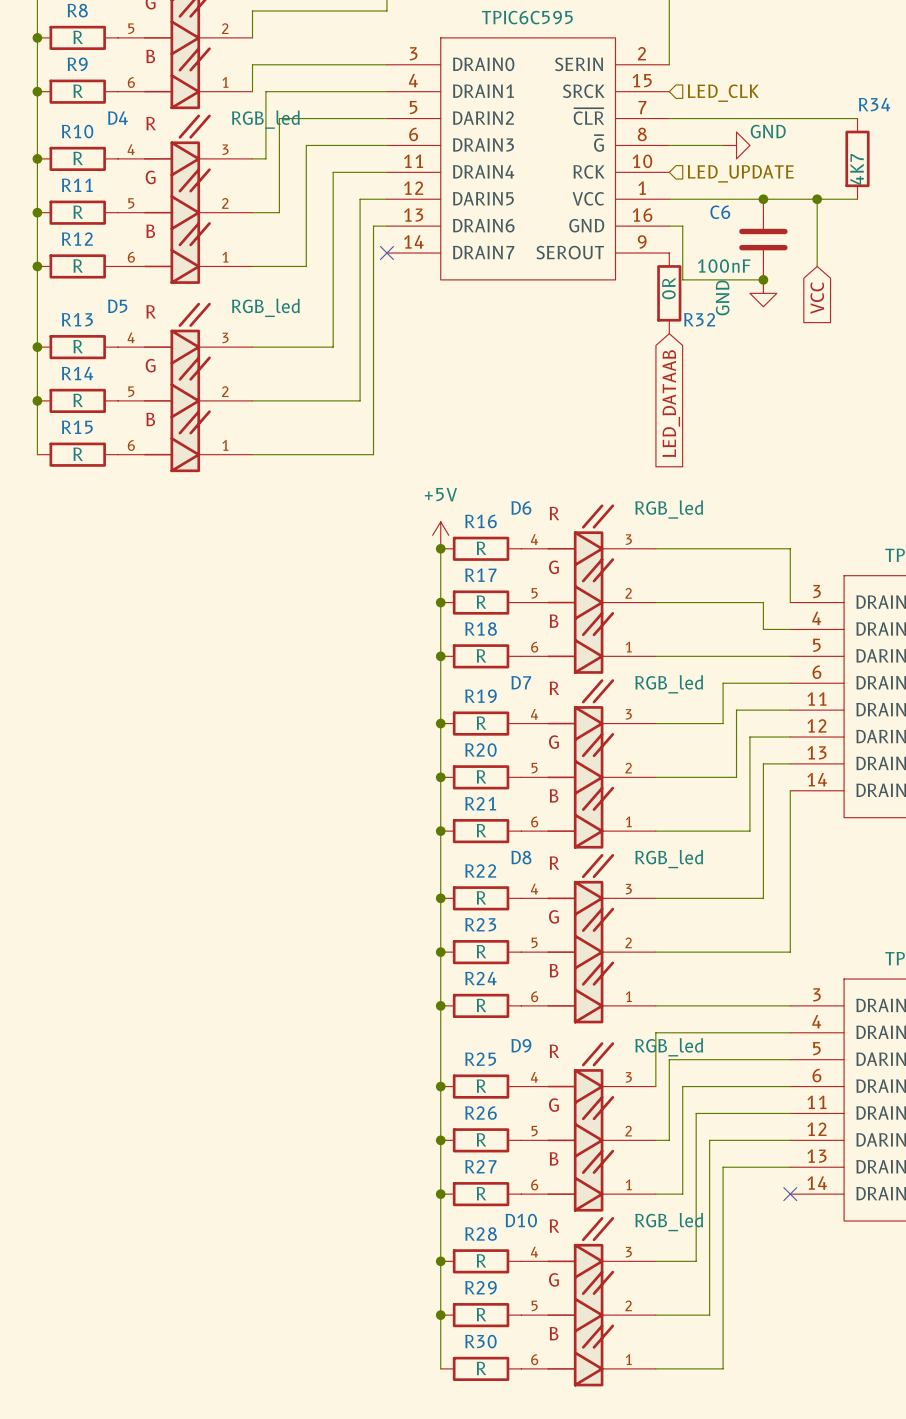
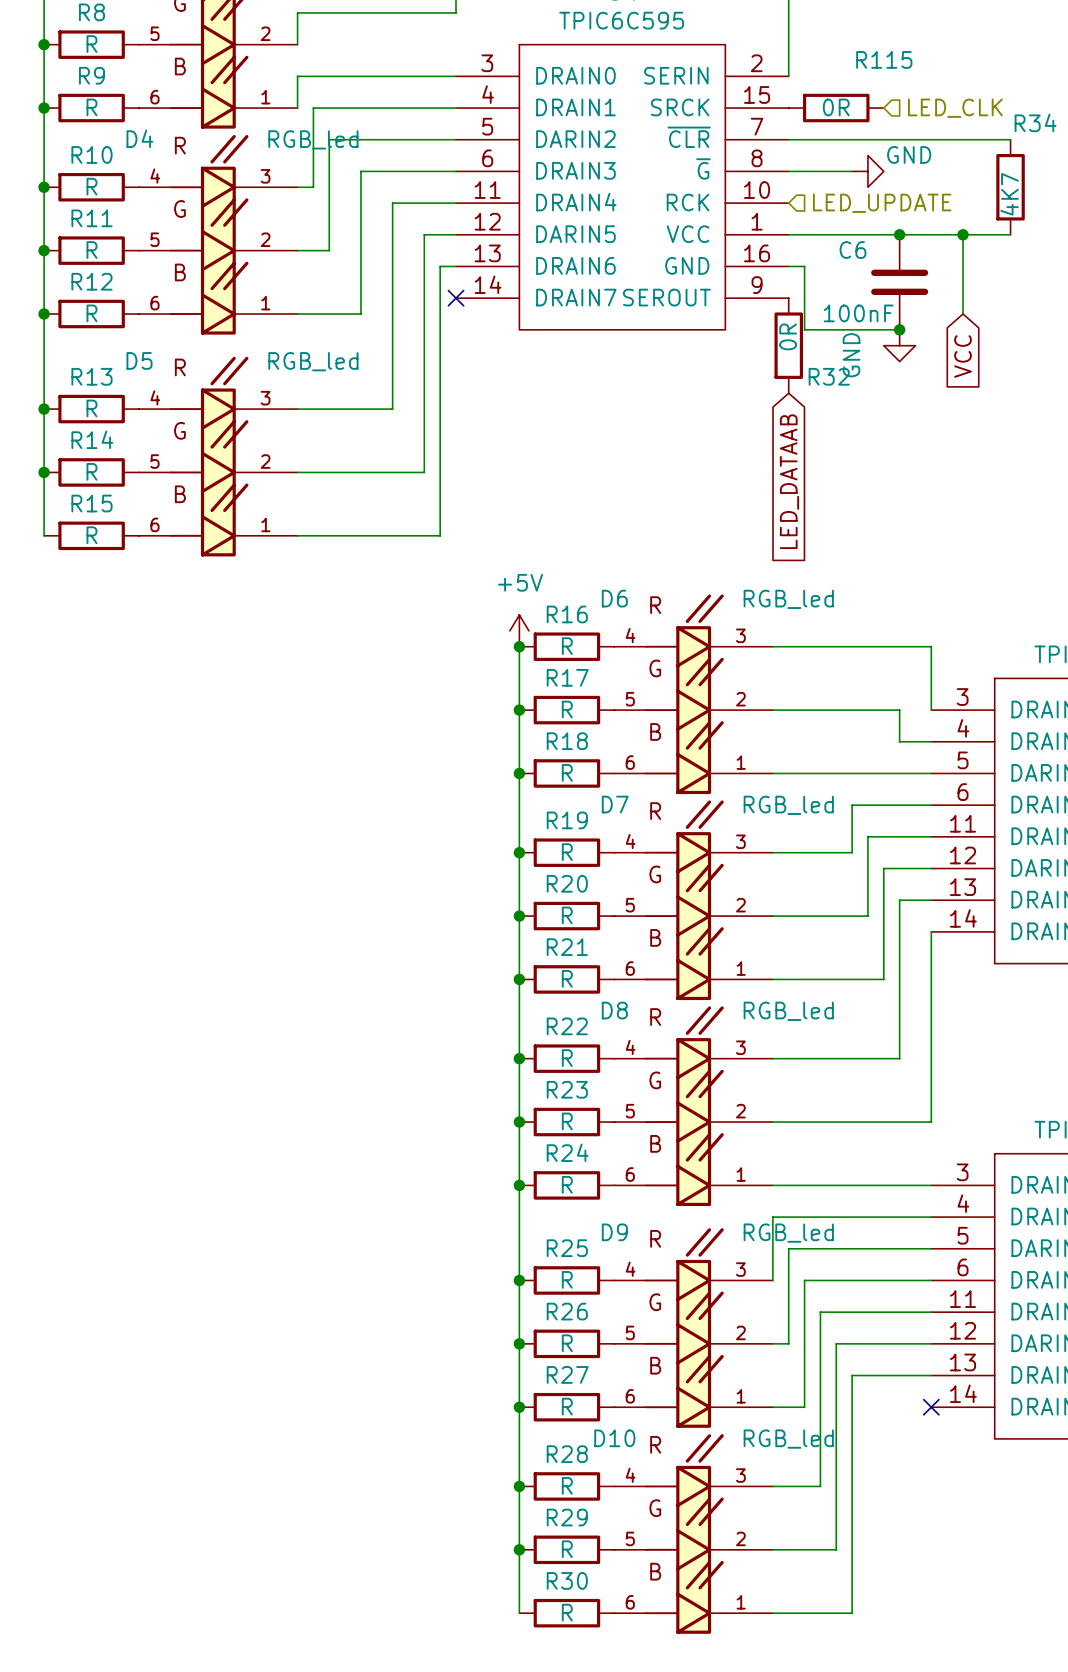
R115: none -> 0R (836, 108)
hierarchical label position: LED_CLK (723, 93) -> LED_CLK (955, 108)

